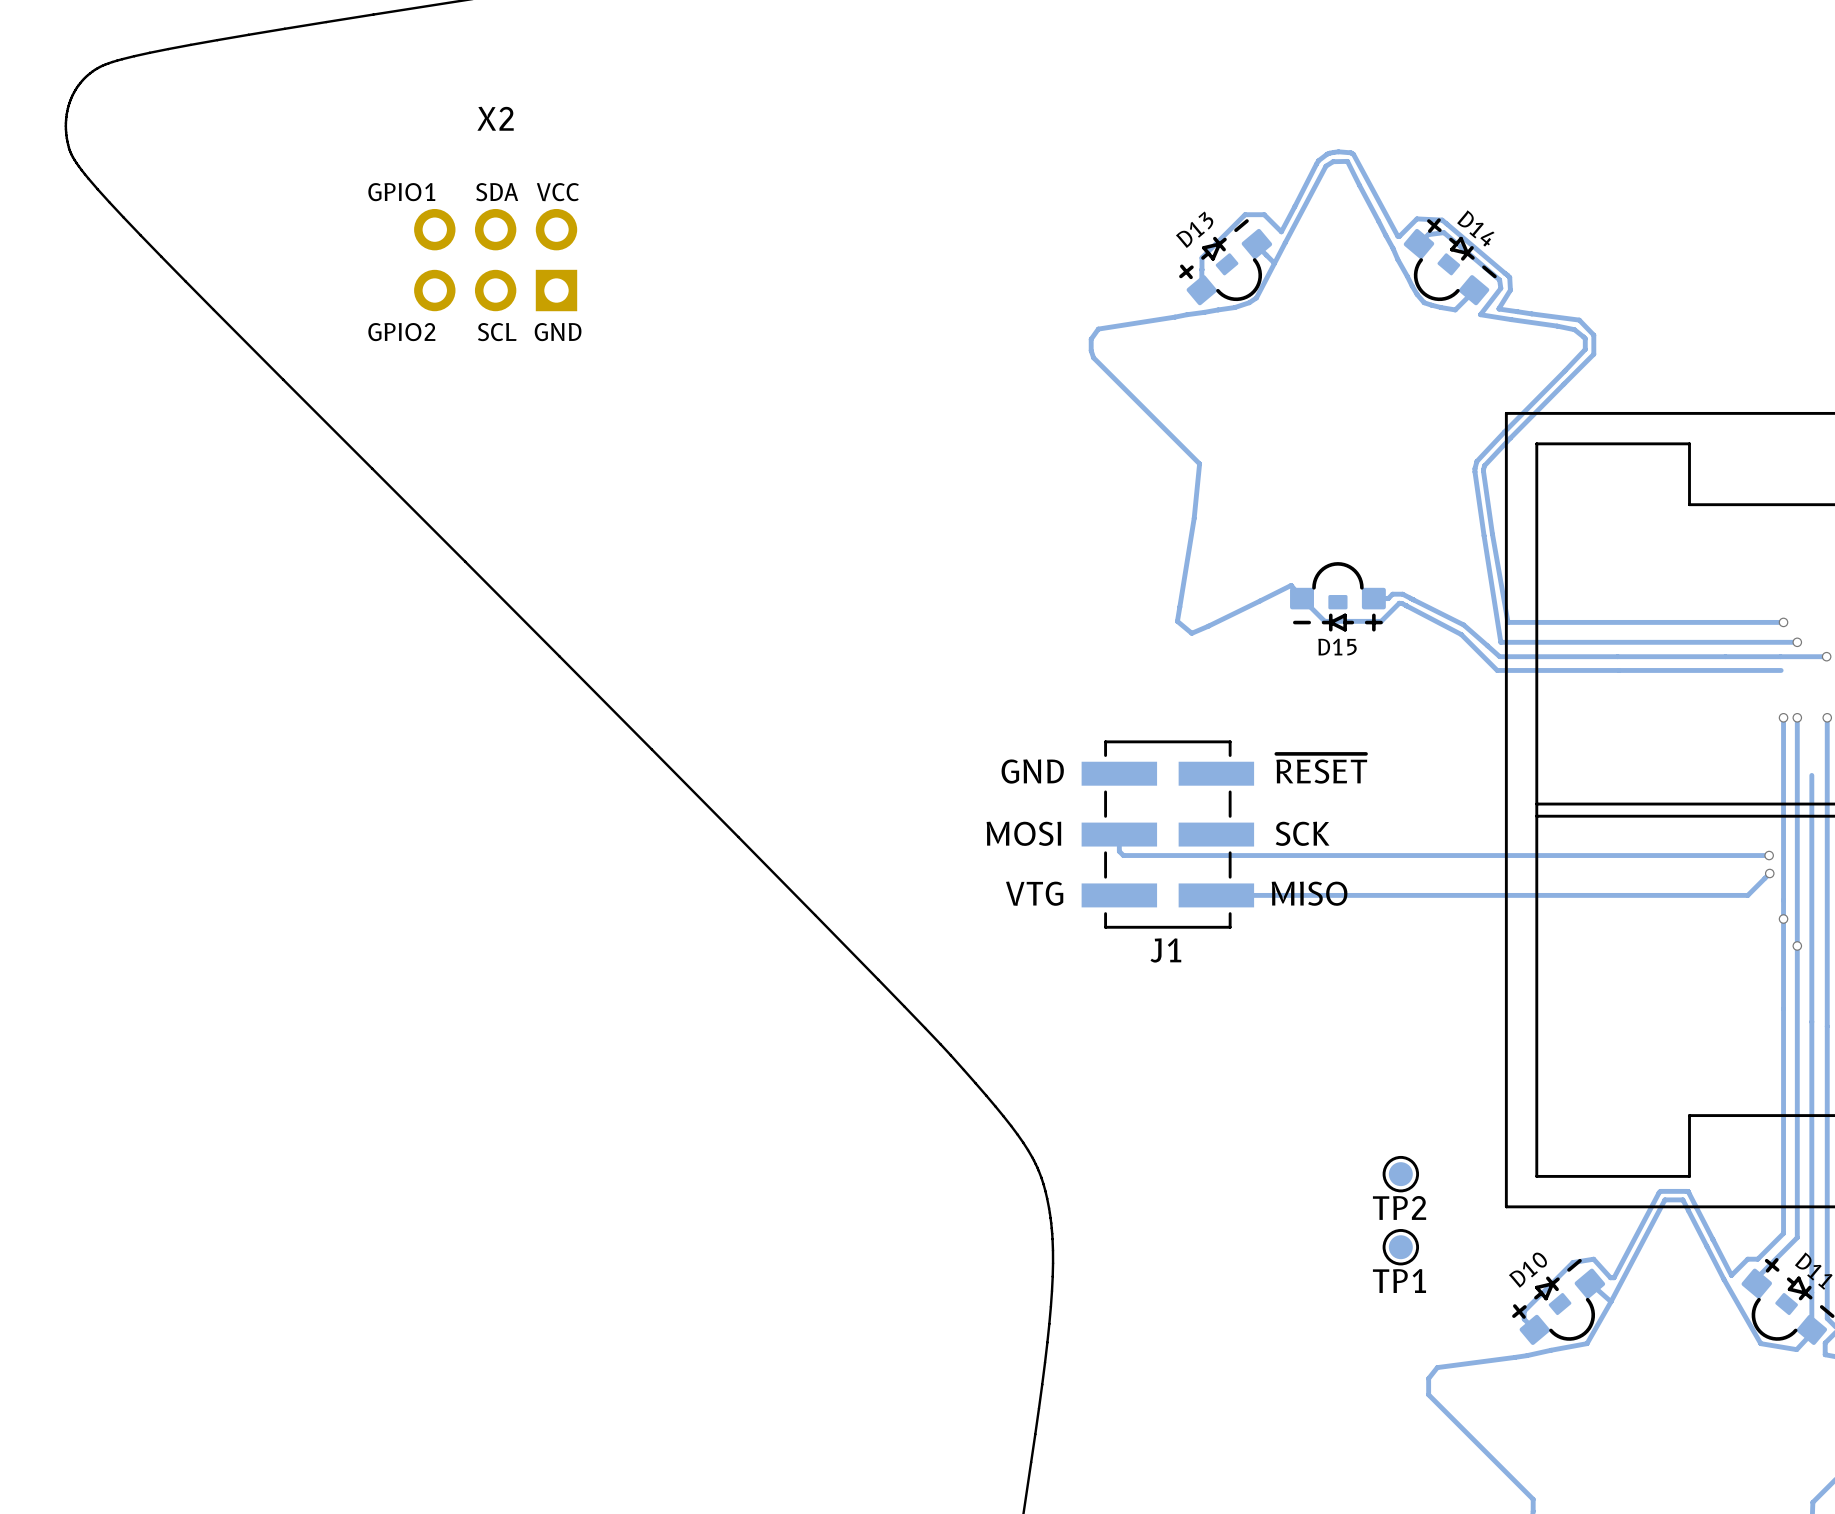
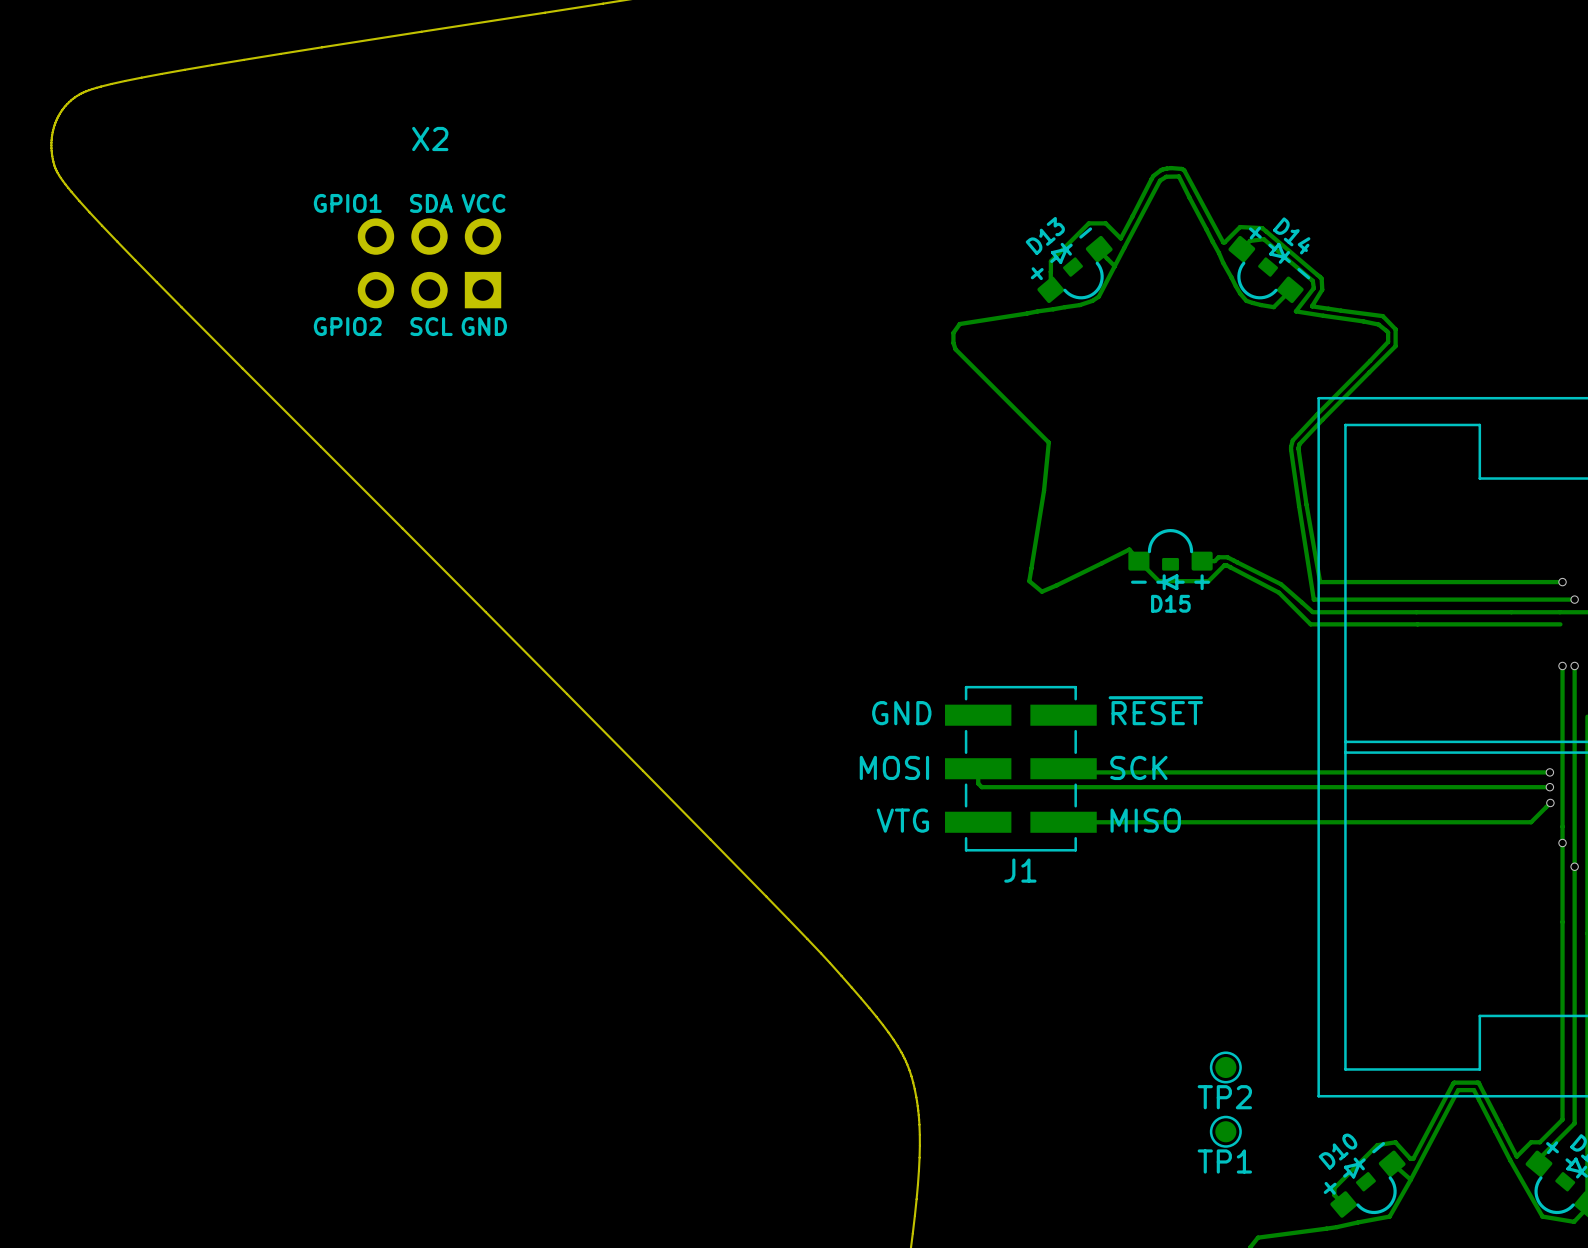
track: none -> (1063, 768) (1067, 772) (1549, 772)
via: none -> (1549, 772)

